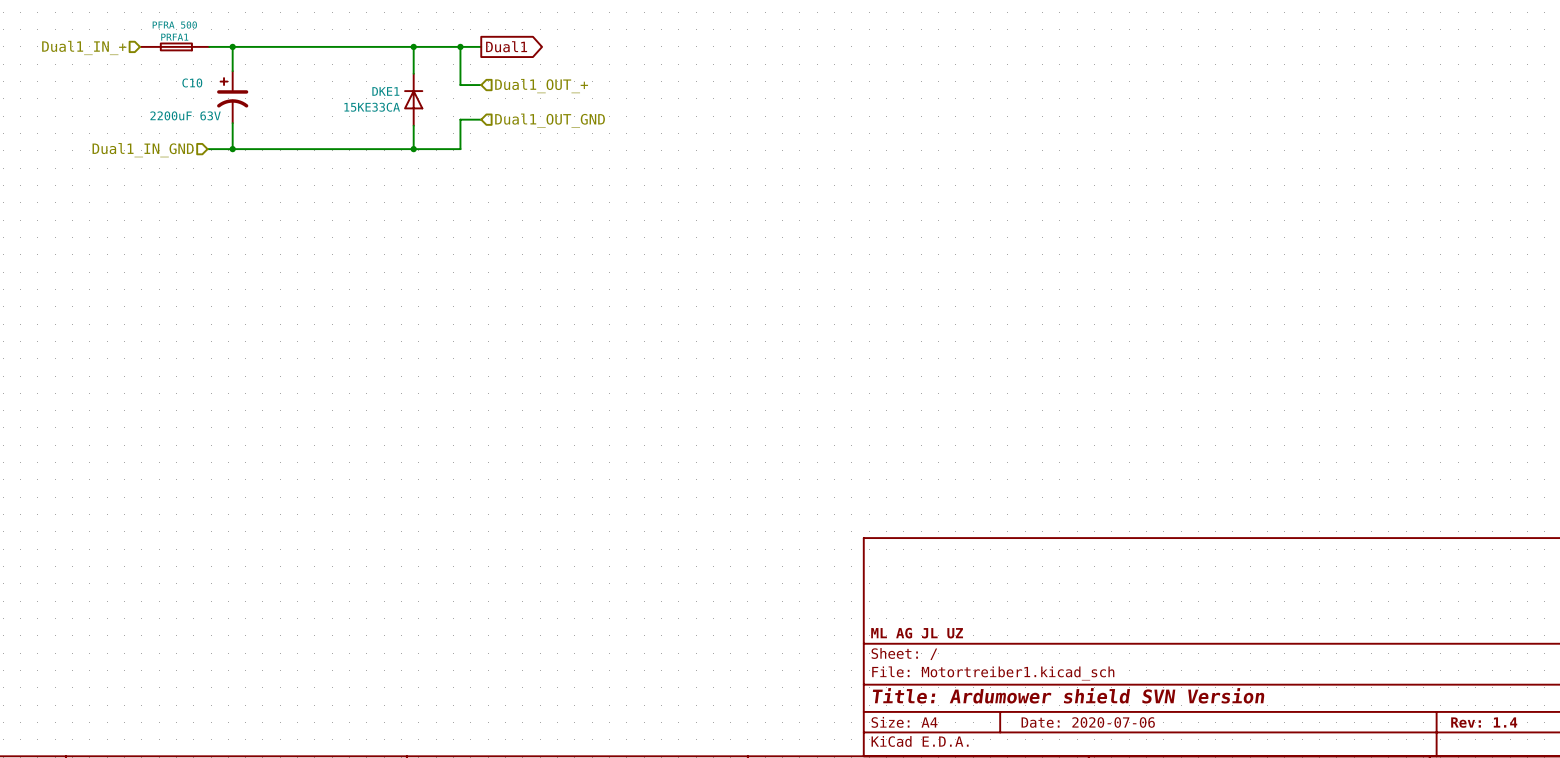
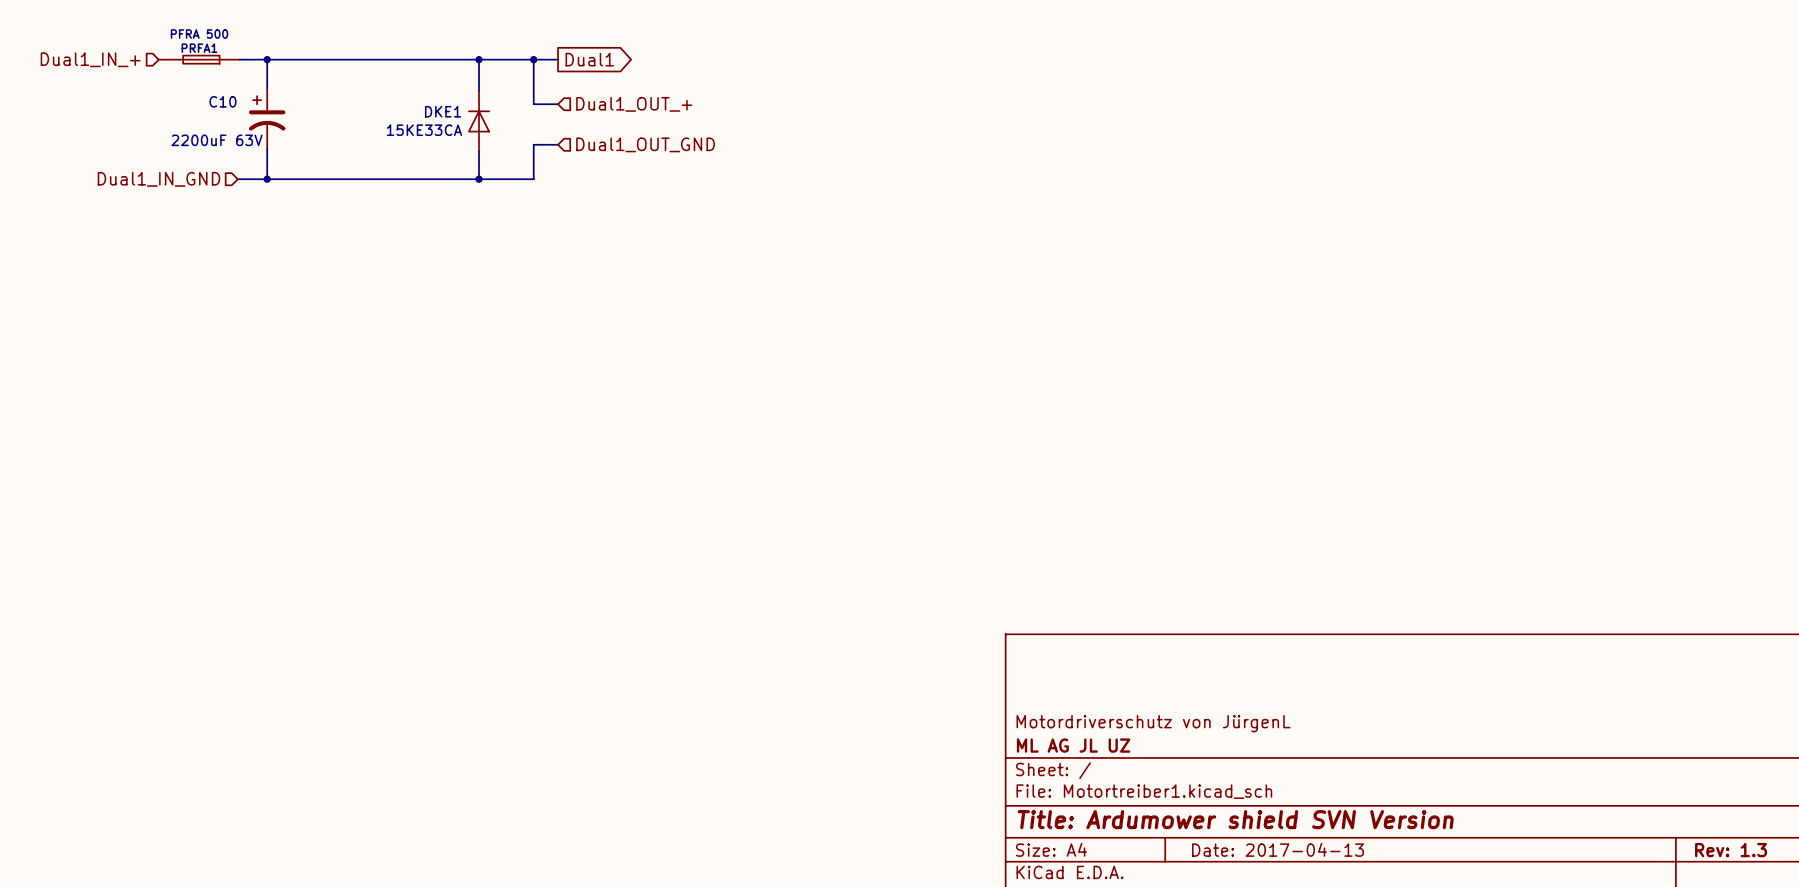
title block: none -> Motordriverschutz von JürgenL (1153, 723)
title block: Date: 2020-07-06 (1088, 722) -> Date: 2017-04-13 (1278, 849)
title block: Rev: 1.4 (1484, 722) -> Rev: 1.3 (1731, 850)

